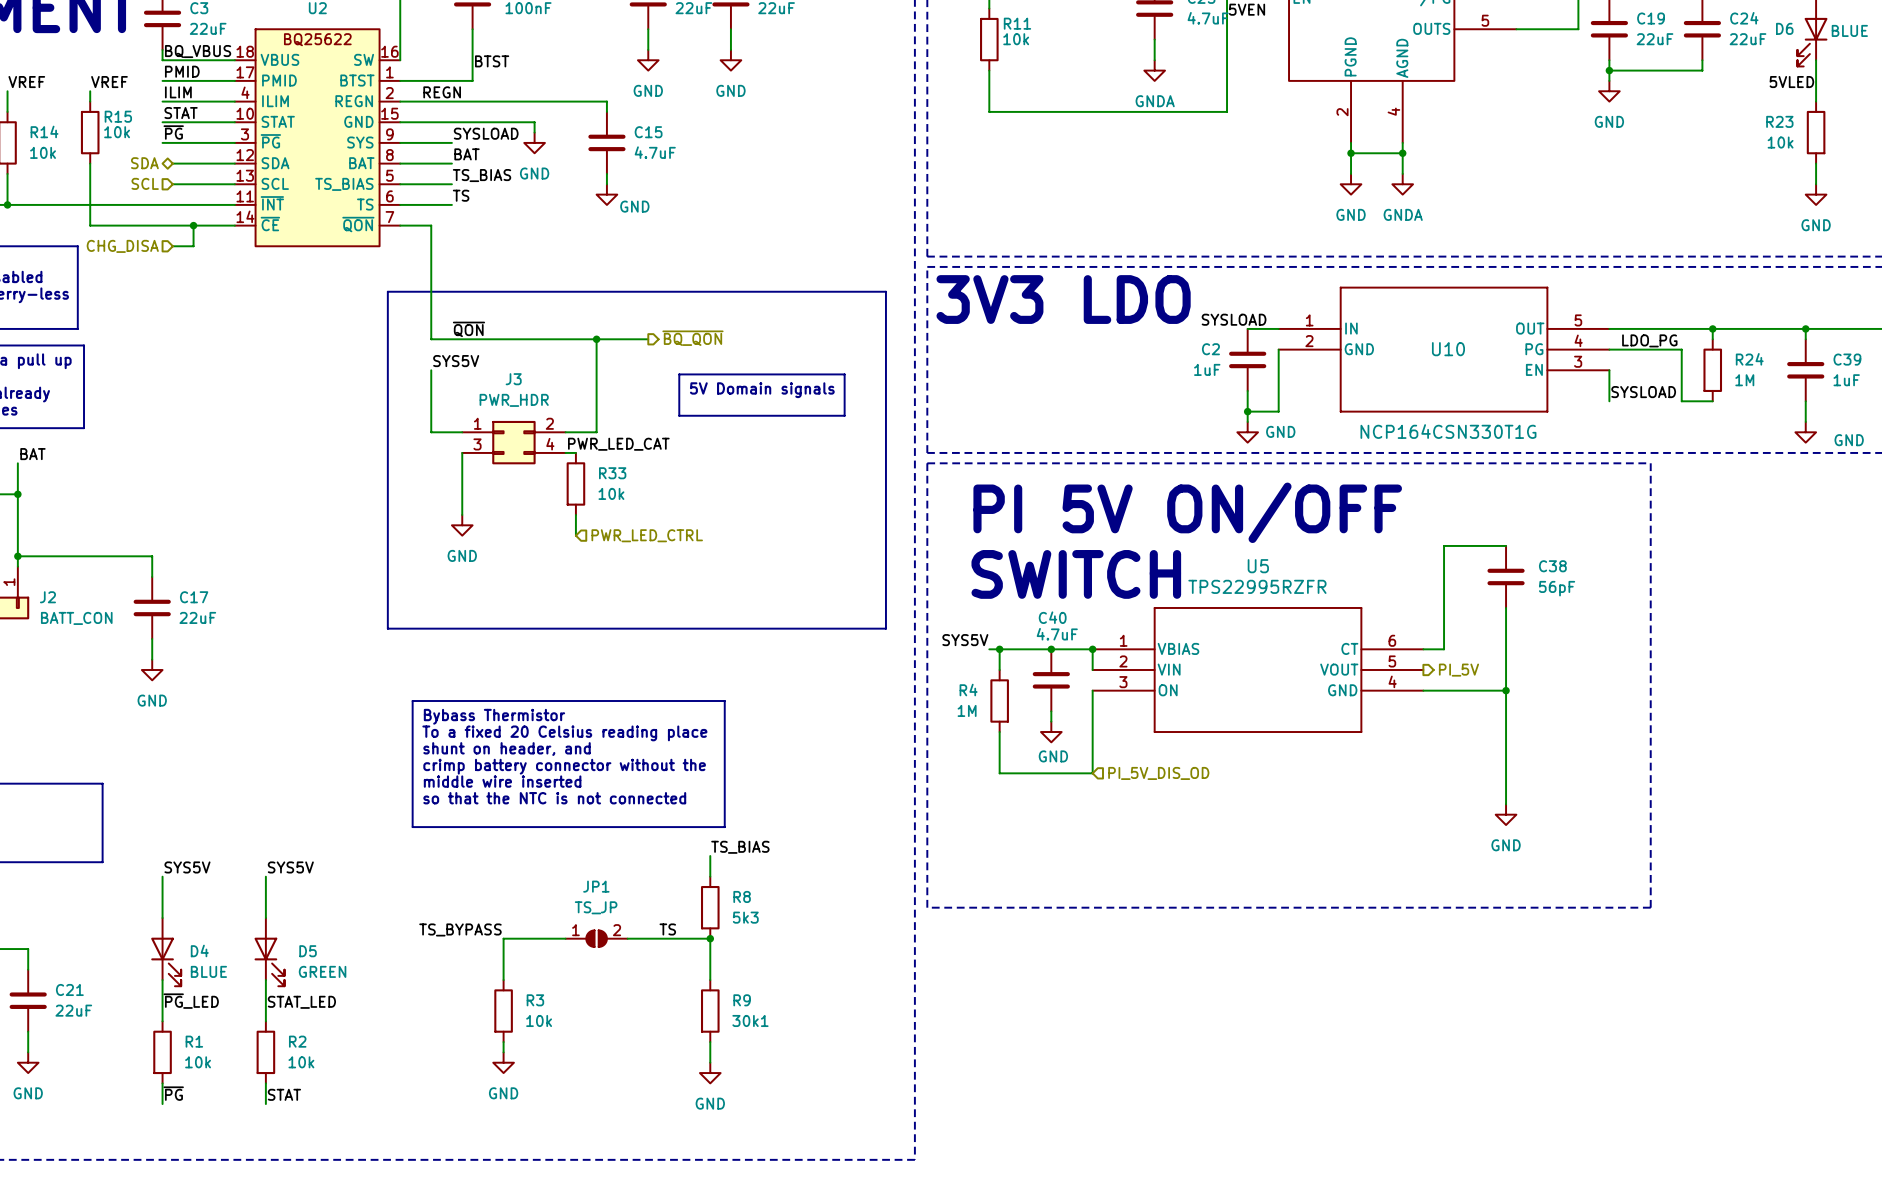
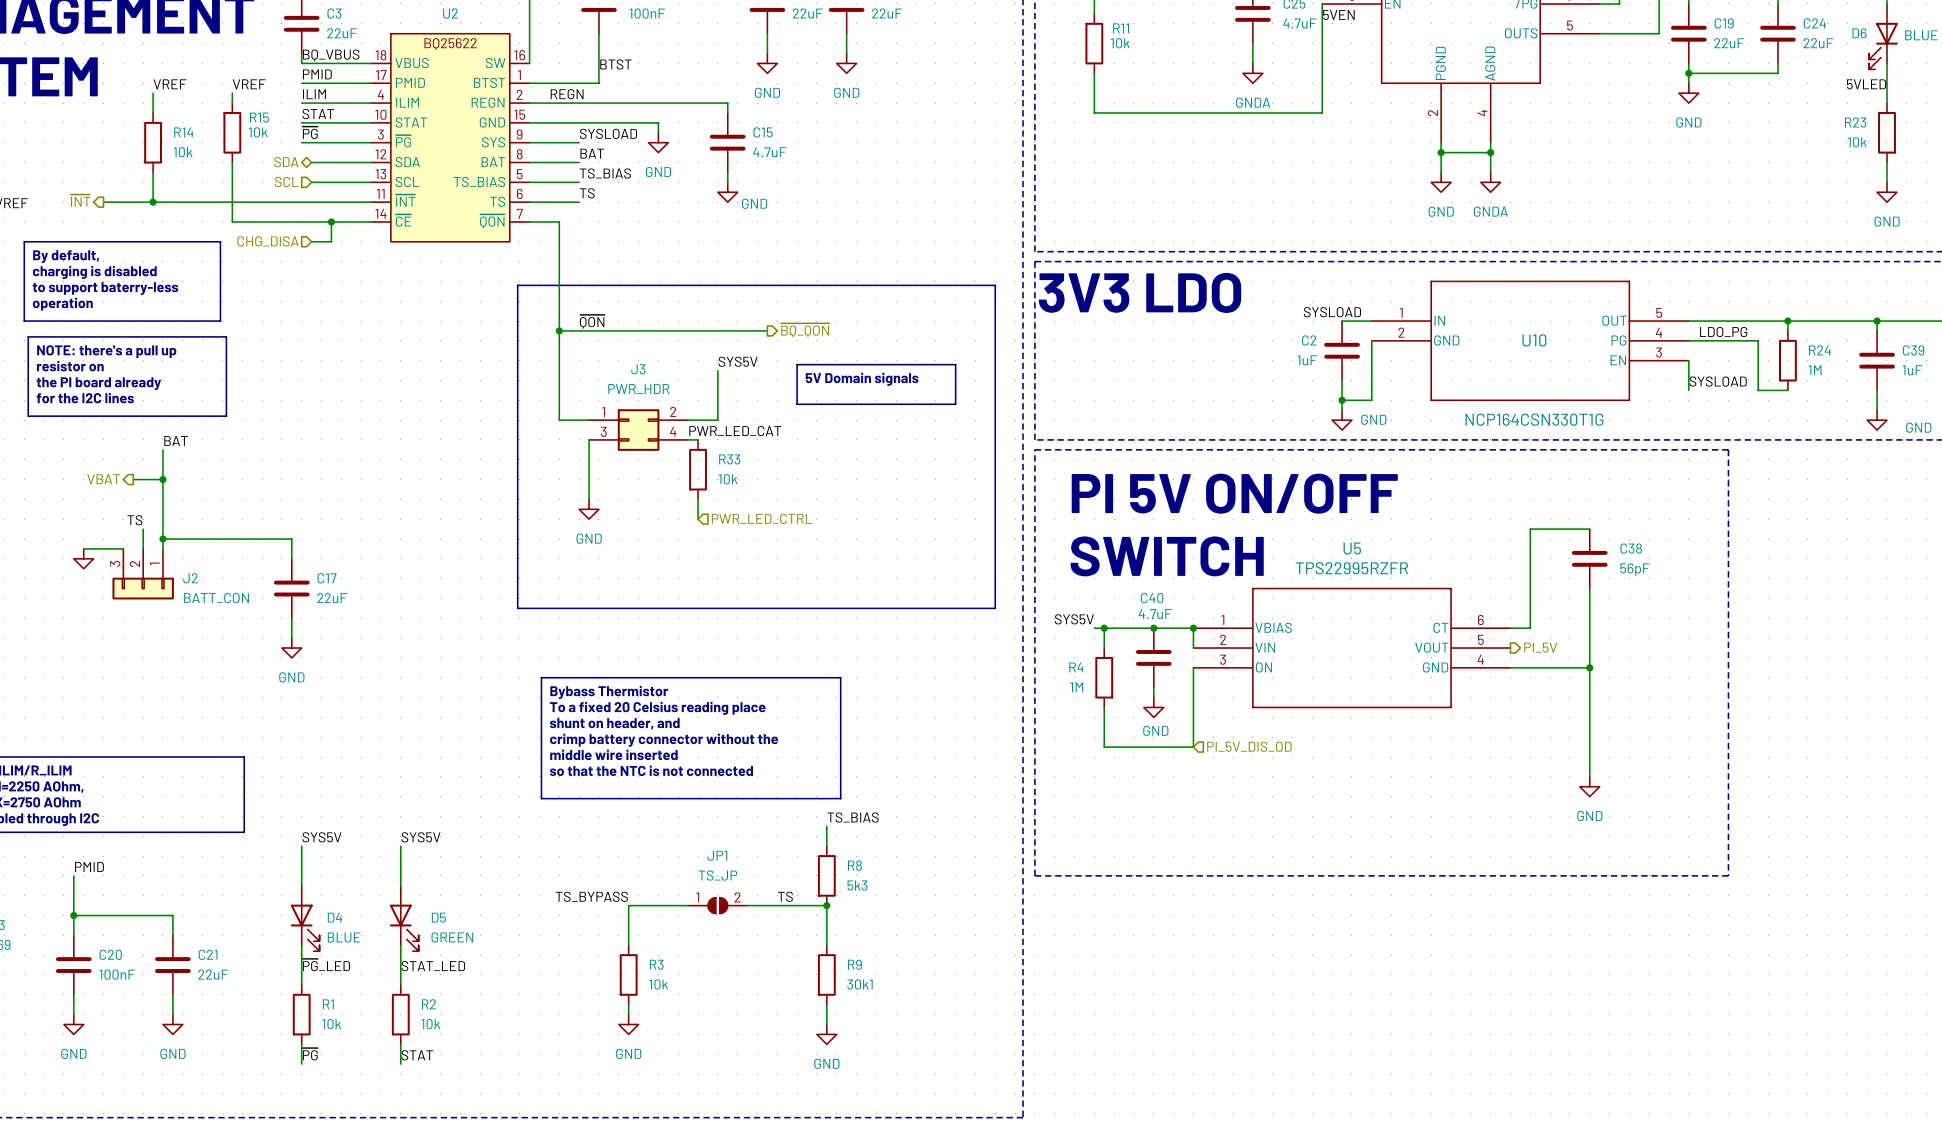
wire: none -> (559, 330) (559, 360)
junction: none -> (559, 330)
wire: (596, 339) (596, 380) -> none
junction: (596, 339) -> none
label position: SYS5V (456, 361) -> SYS5V (738, 361)

